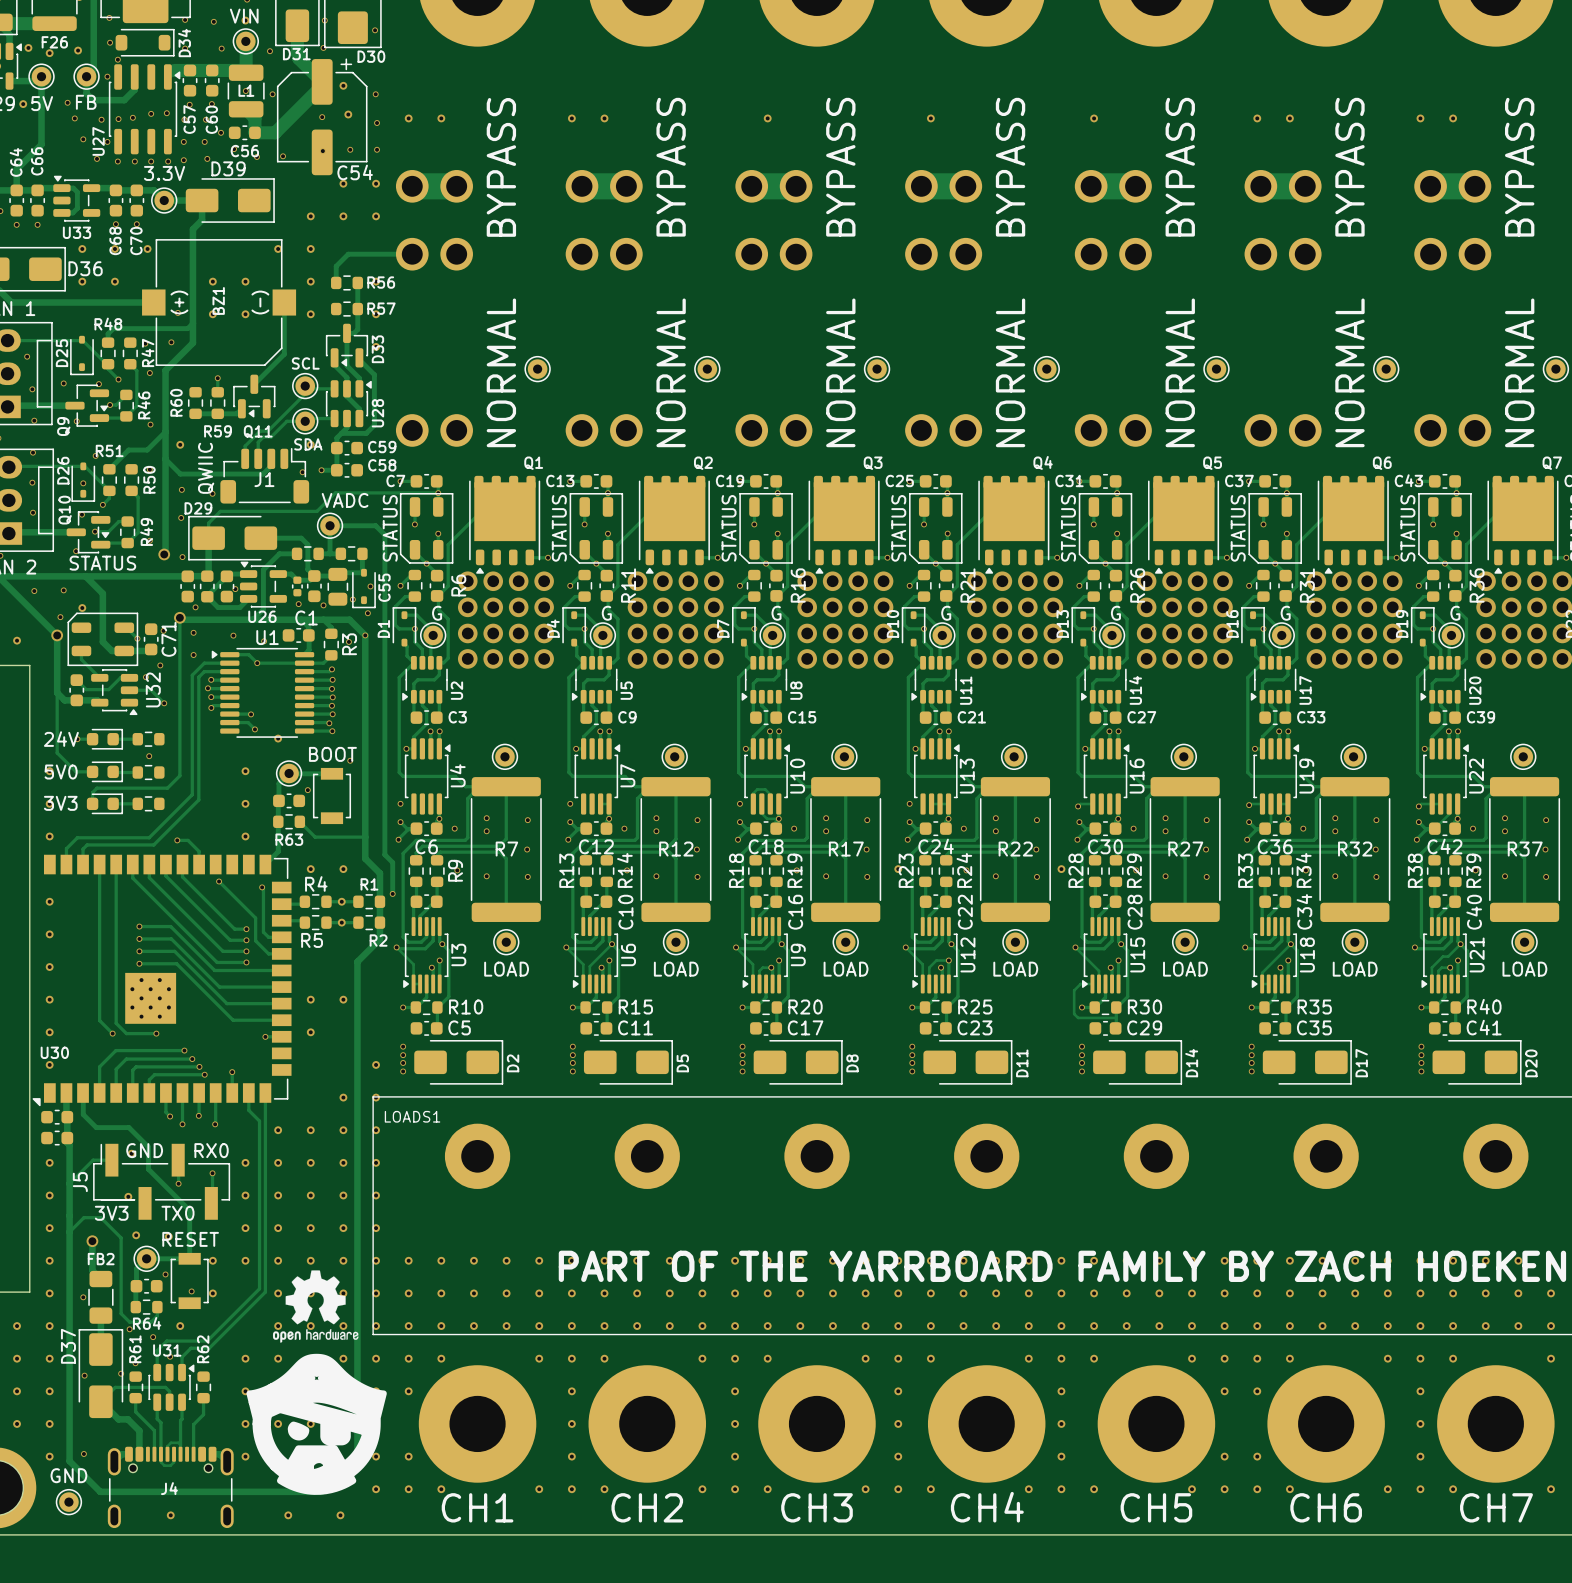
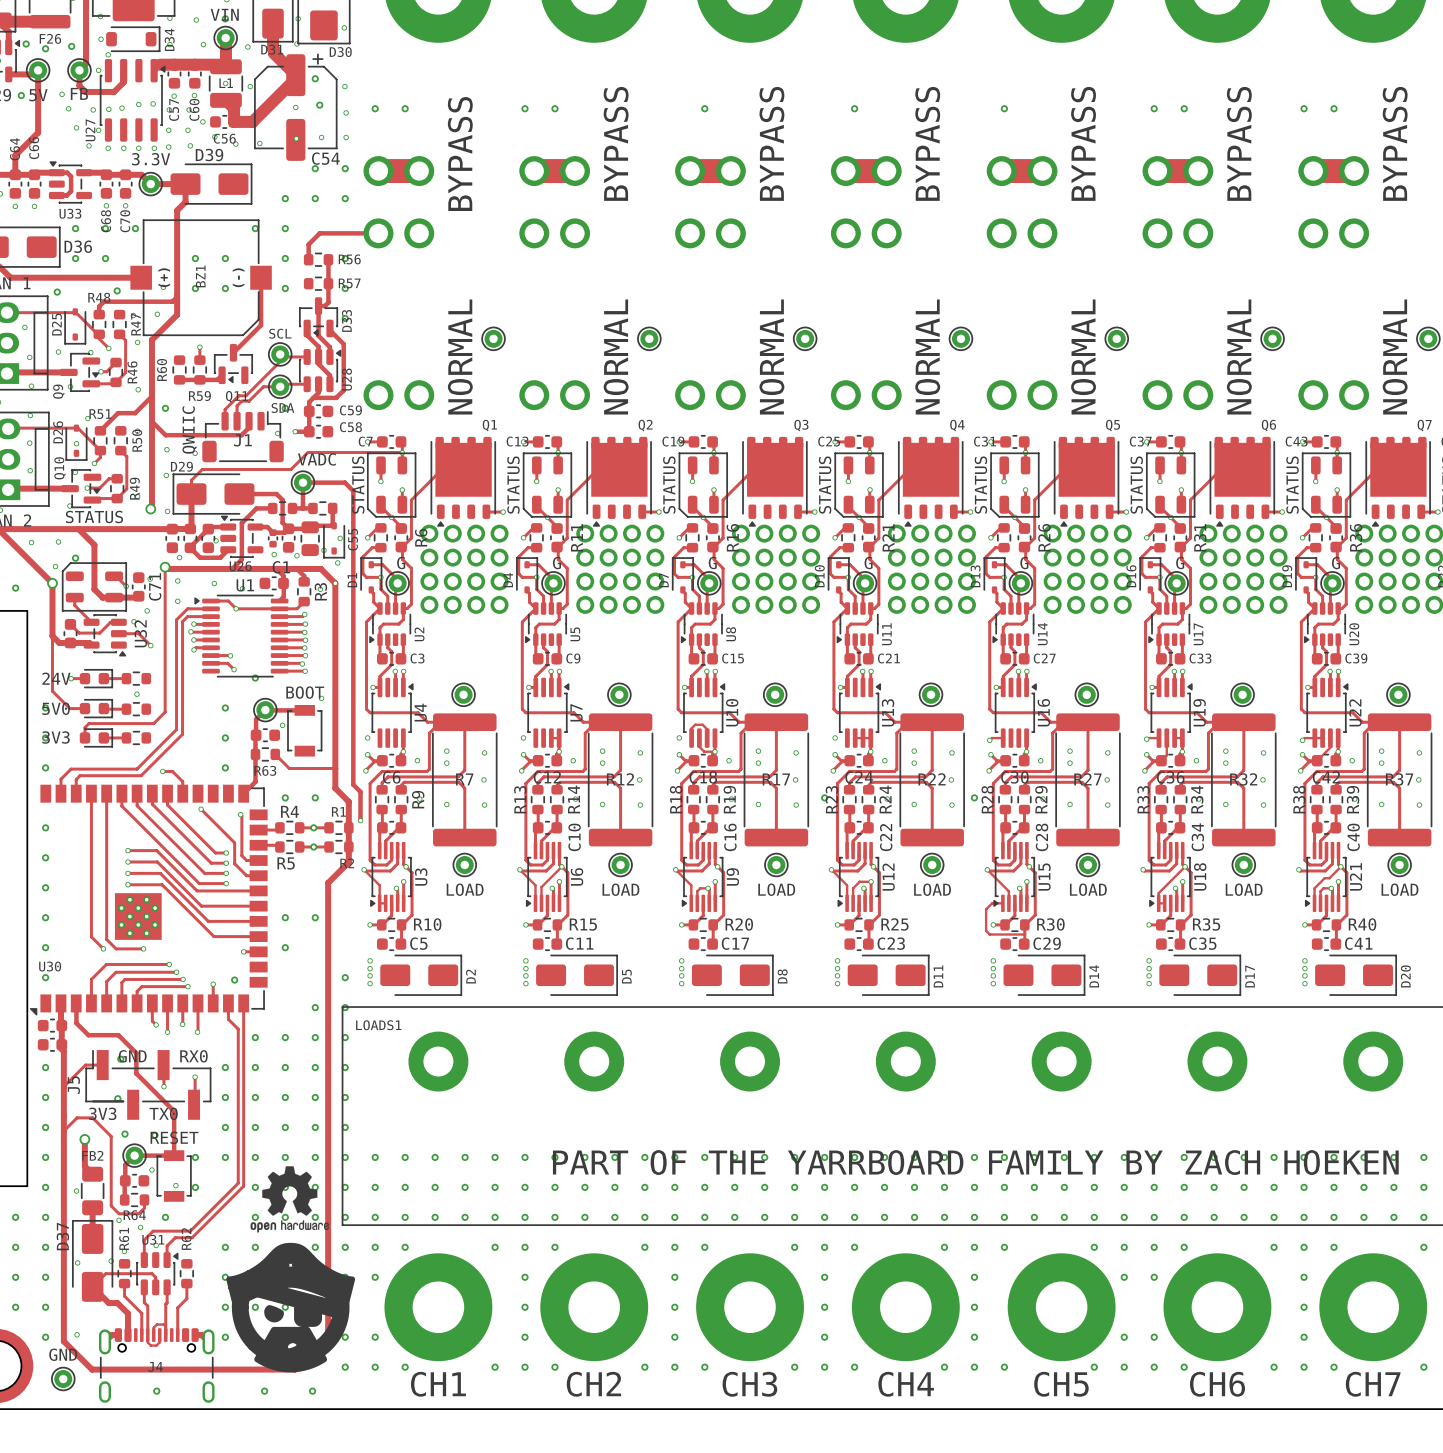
via: none -> (117, 290)
via: none -> (57, 292)
via: none -> (234, 980)

